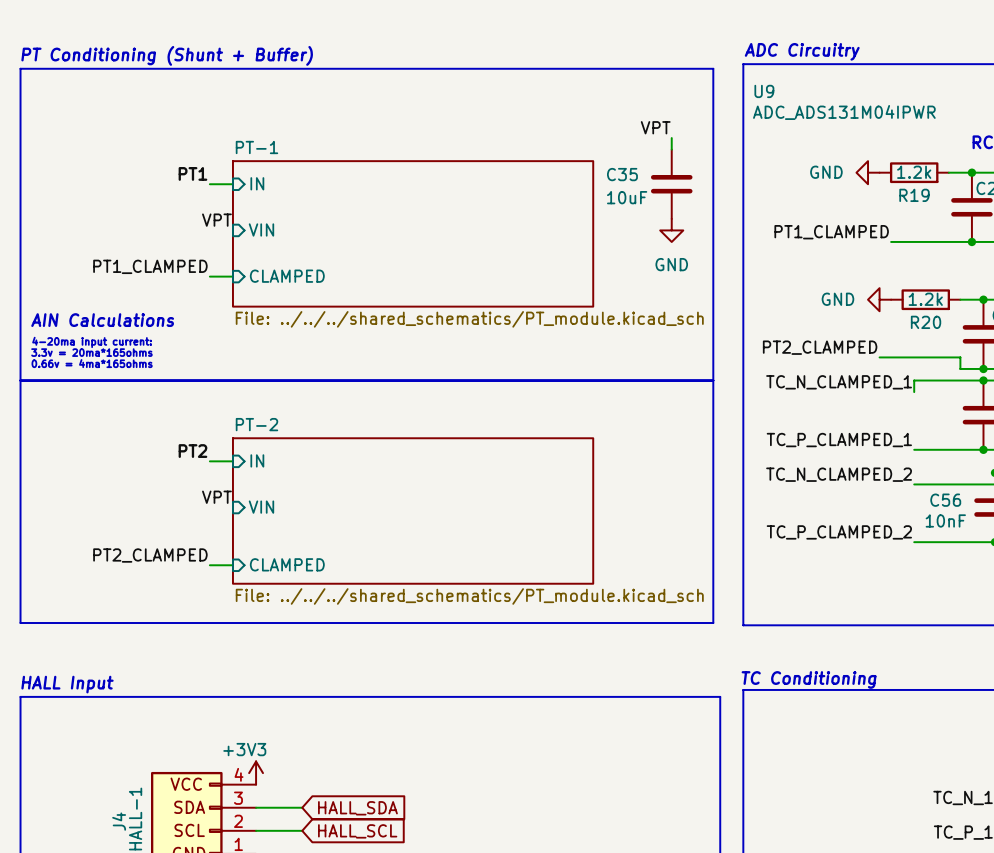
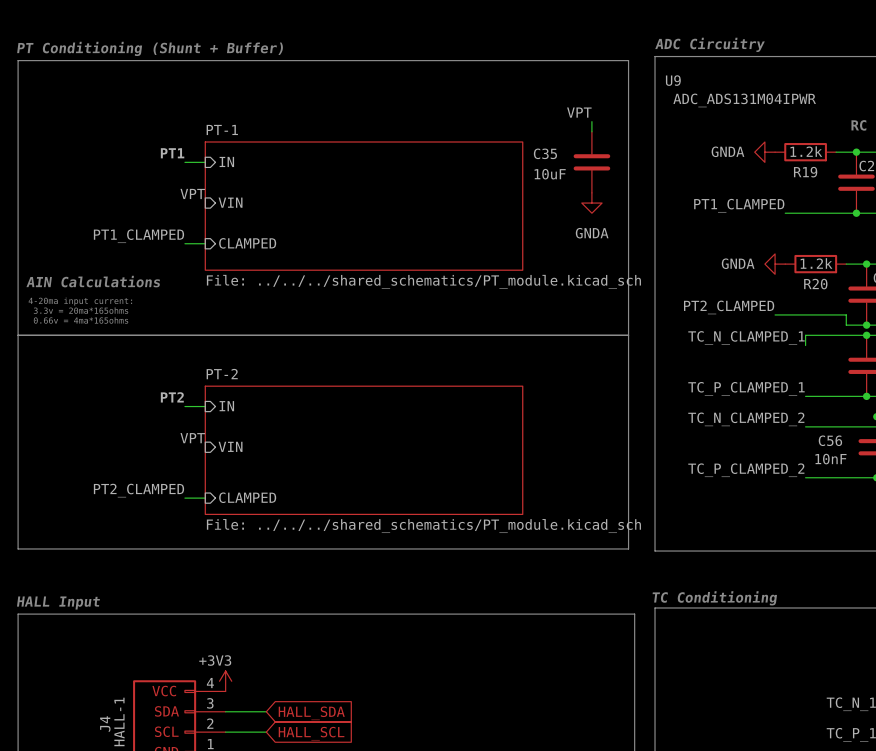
power symbol: GND (868, 172) -> GNDA (764, 152)
power symbol: GND (671, 230) -> GNDA (591, 203)
power symbol: GND (879, 299) -> GNDA (775, 264)

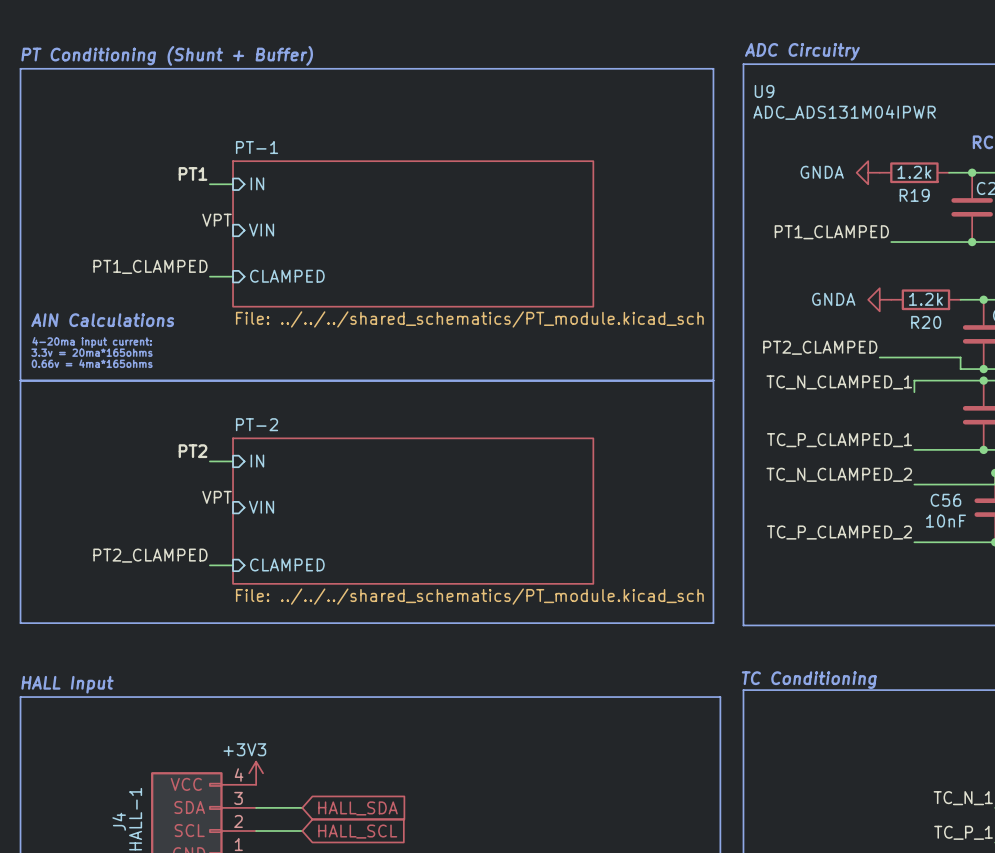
label: VPT (579, 112) -> none
wire: (591, 121) (591, 131) -> none
C35: 10uF (591, 162) -> none
power symbol: GNDA (591, 203) -> none

